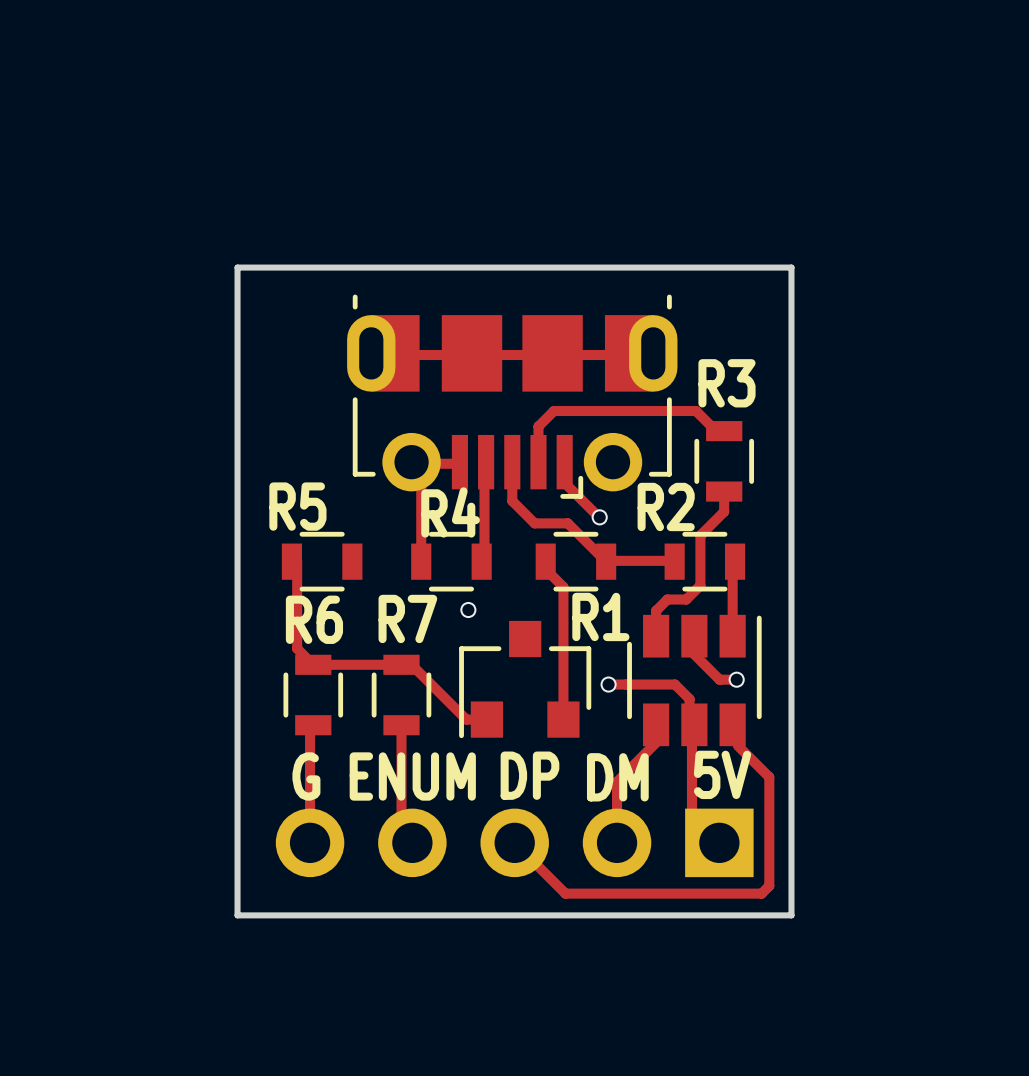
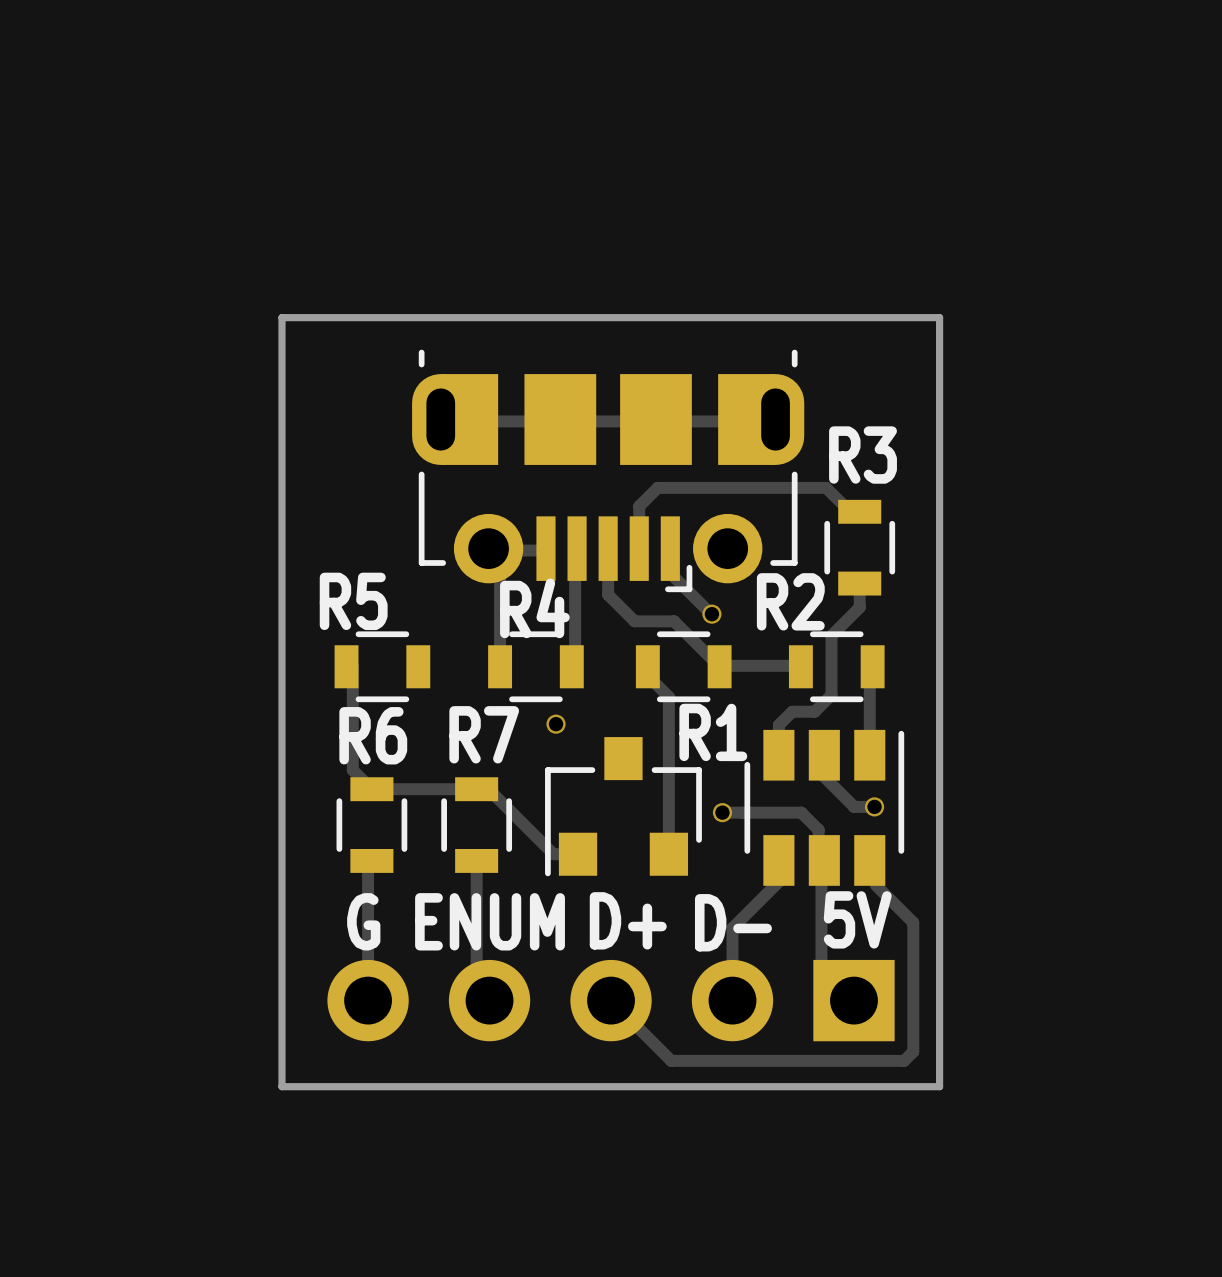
text: DP (529, 775) -> D+ (628, 920)
text: DM (617, 777) -> D- (733, 922)

